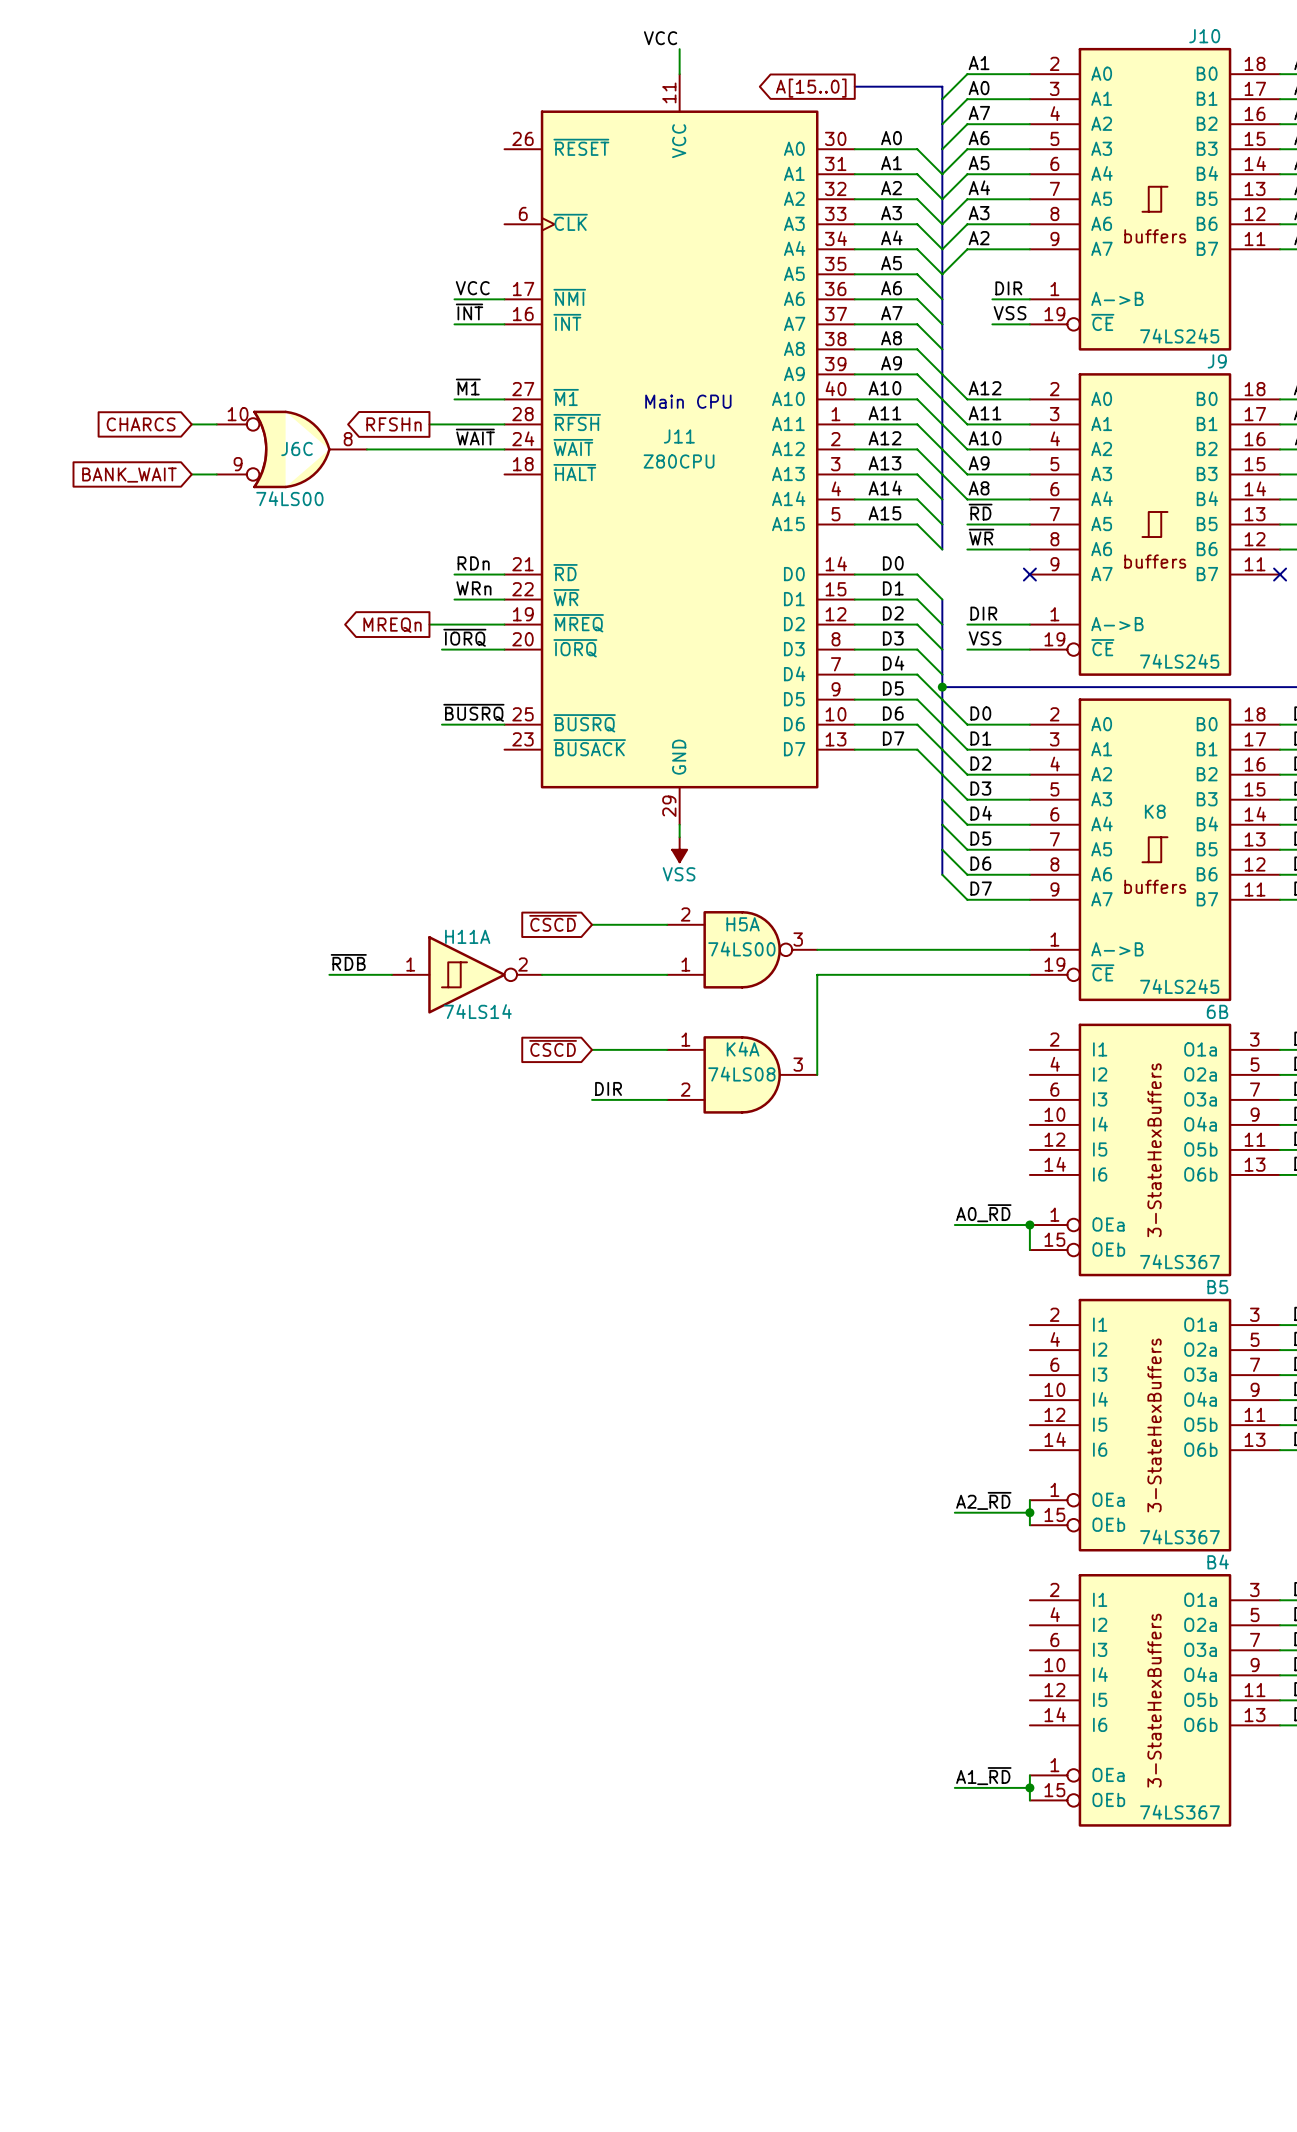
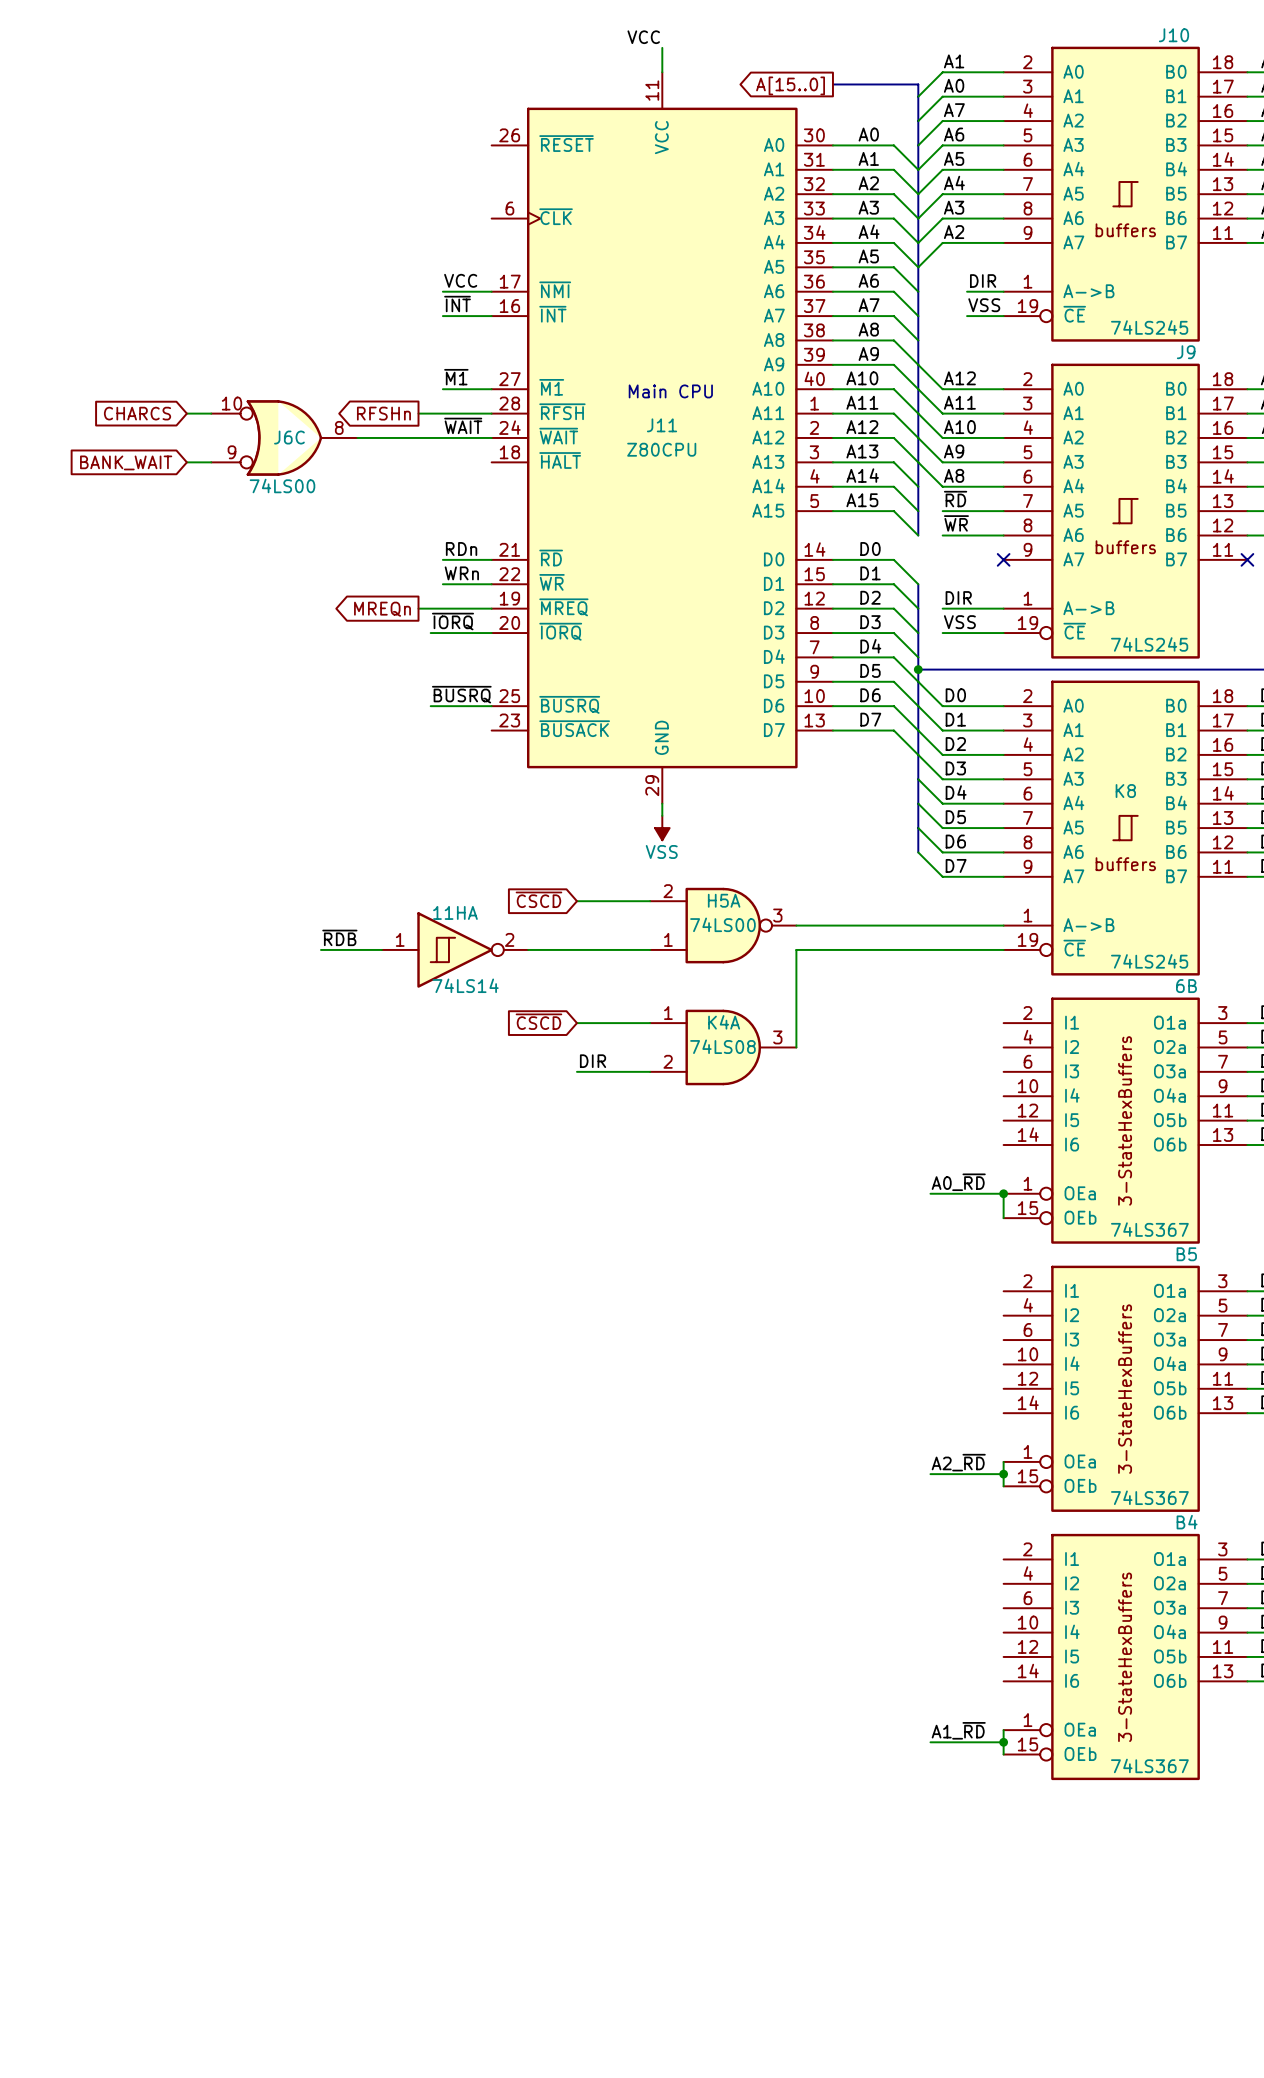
H11A name: H11A (467, 936) -> 11HA (455, 912)

